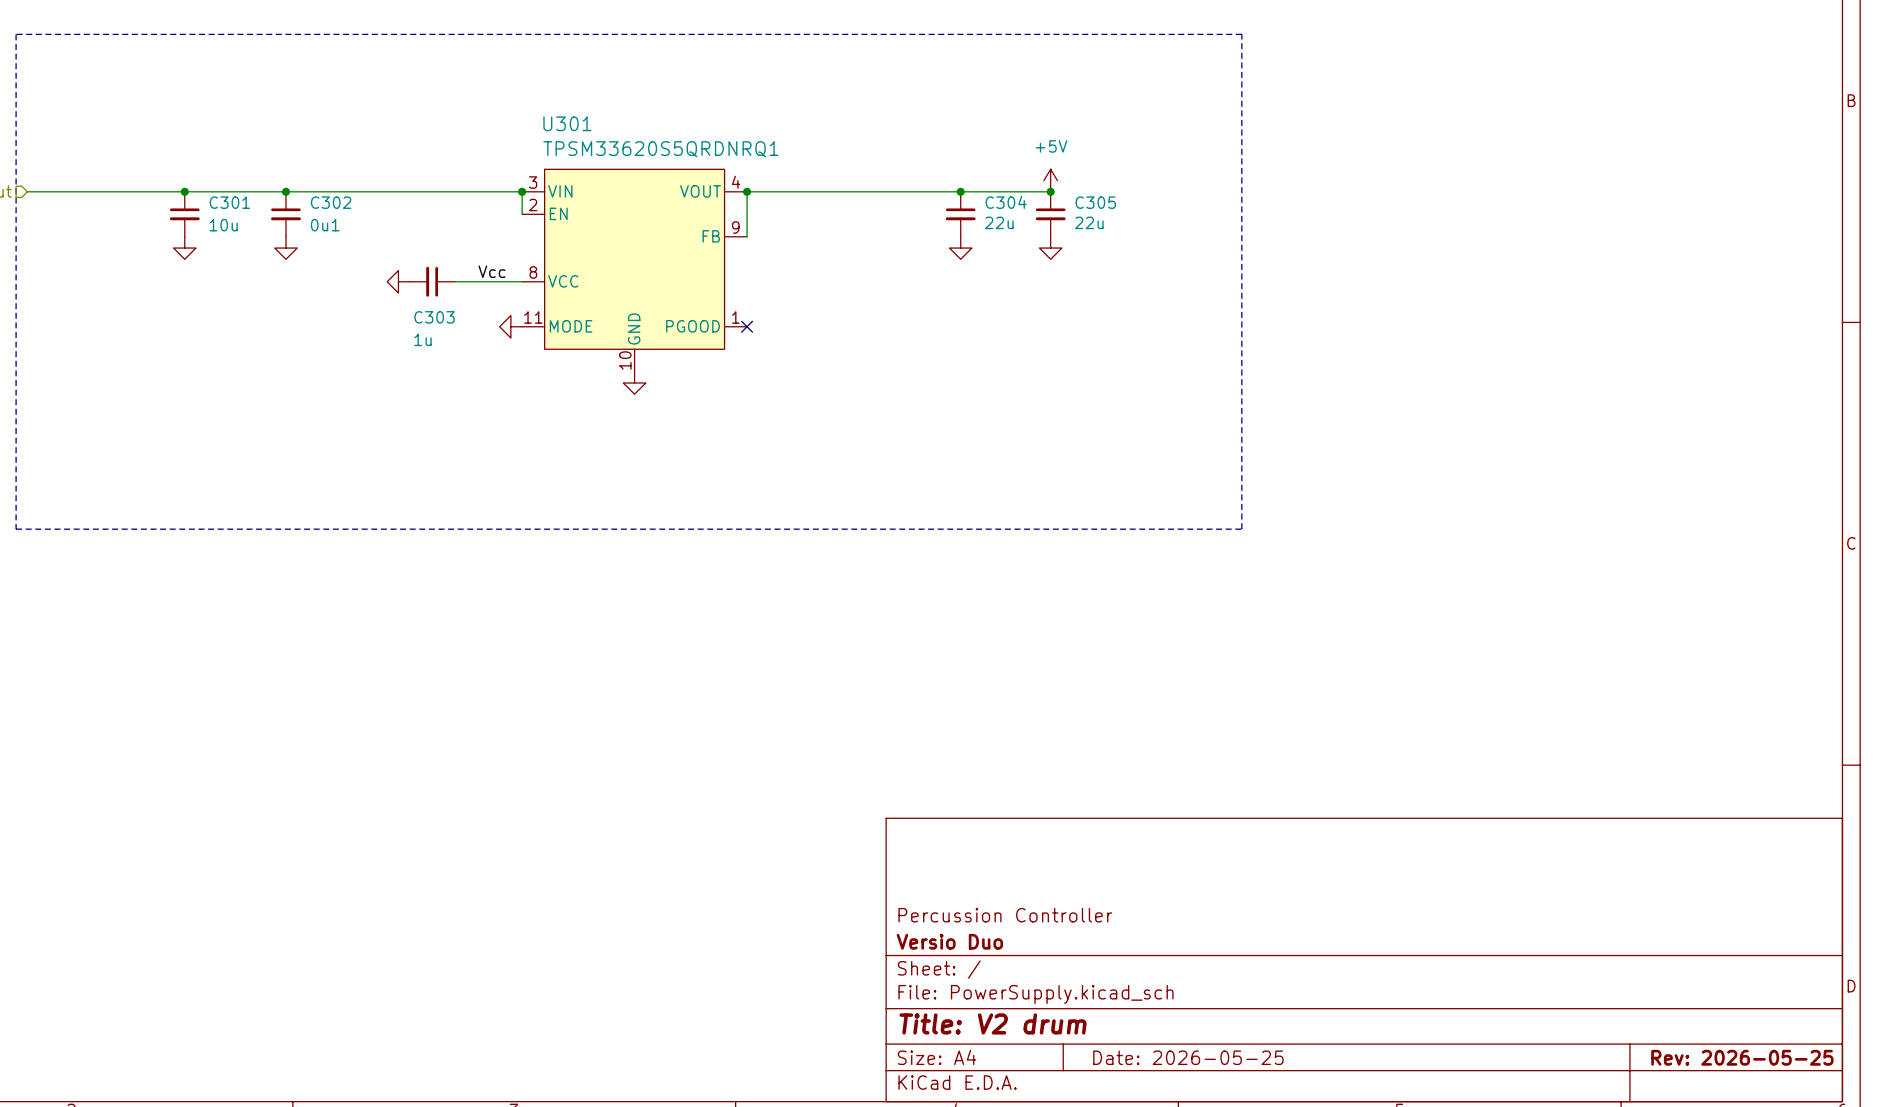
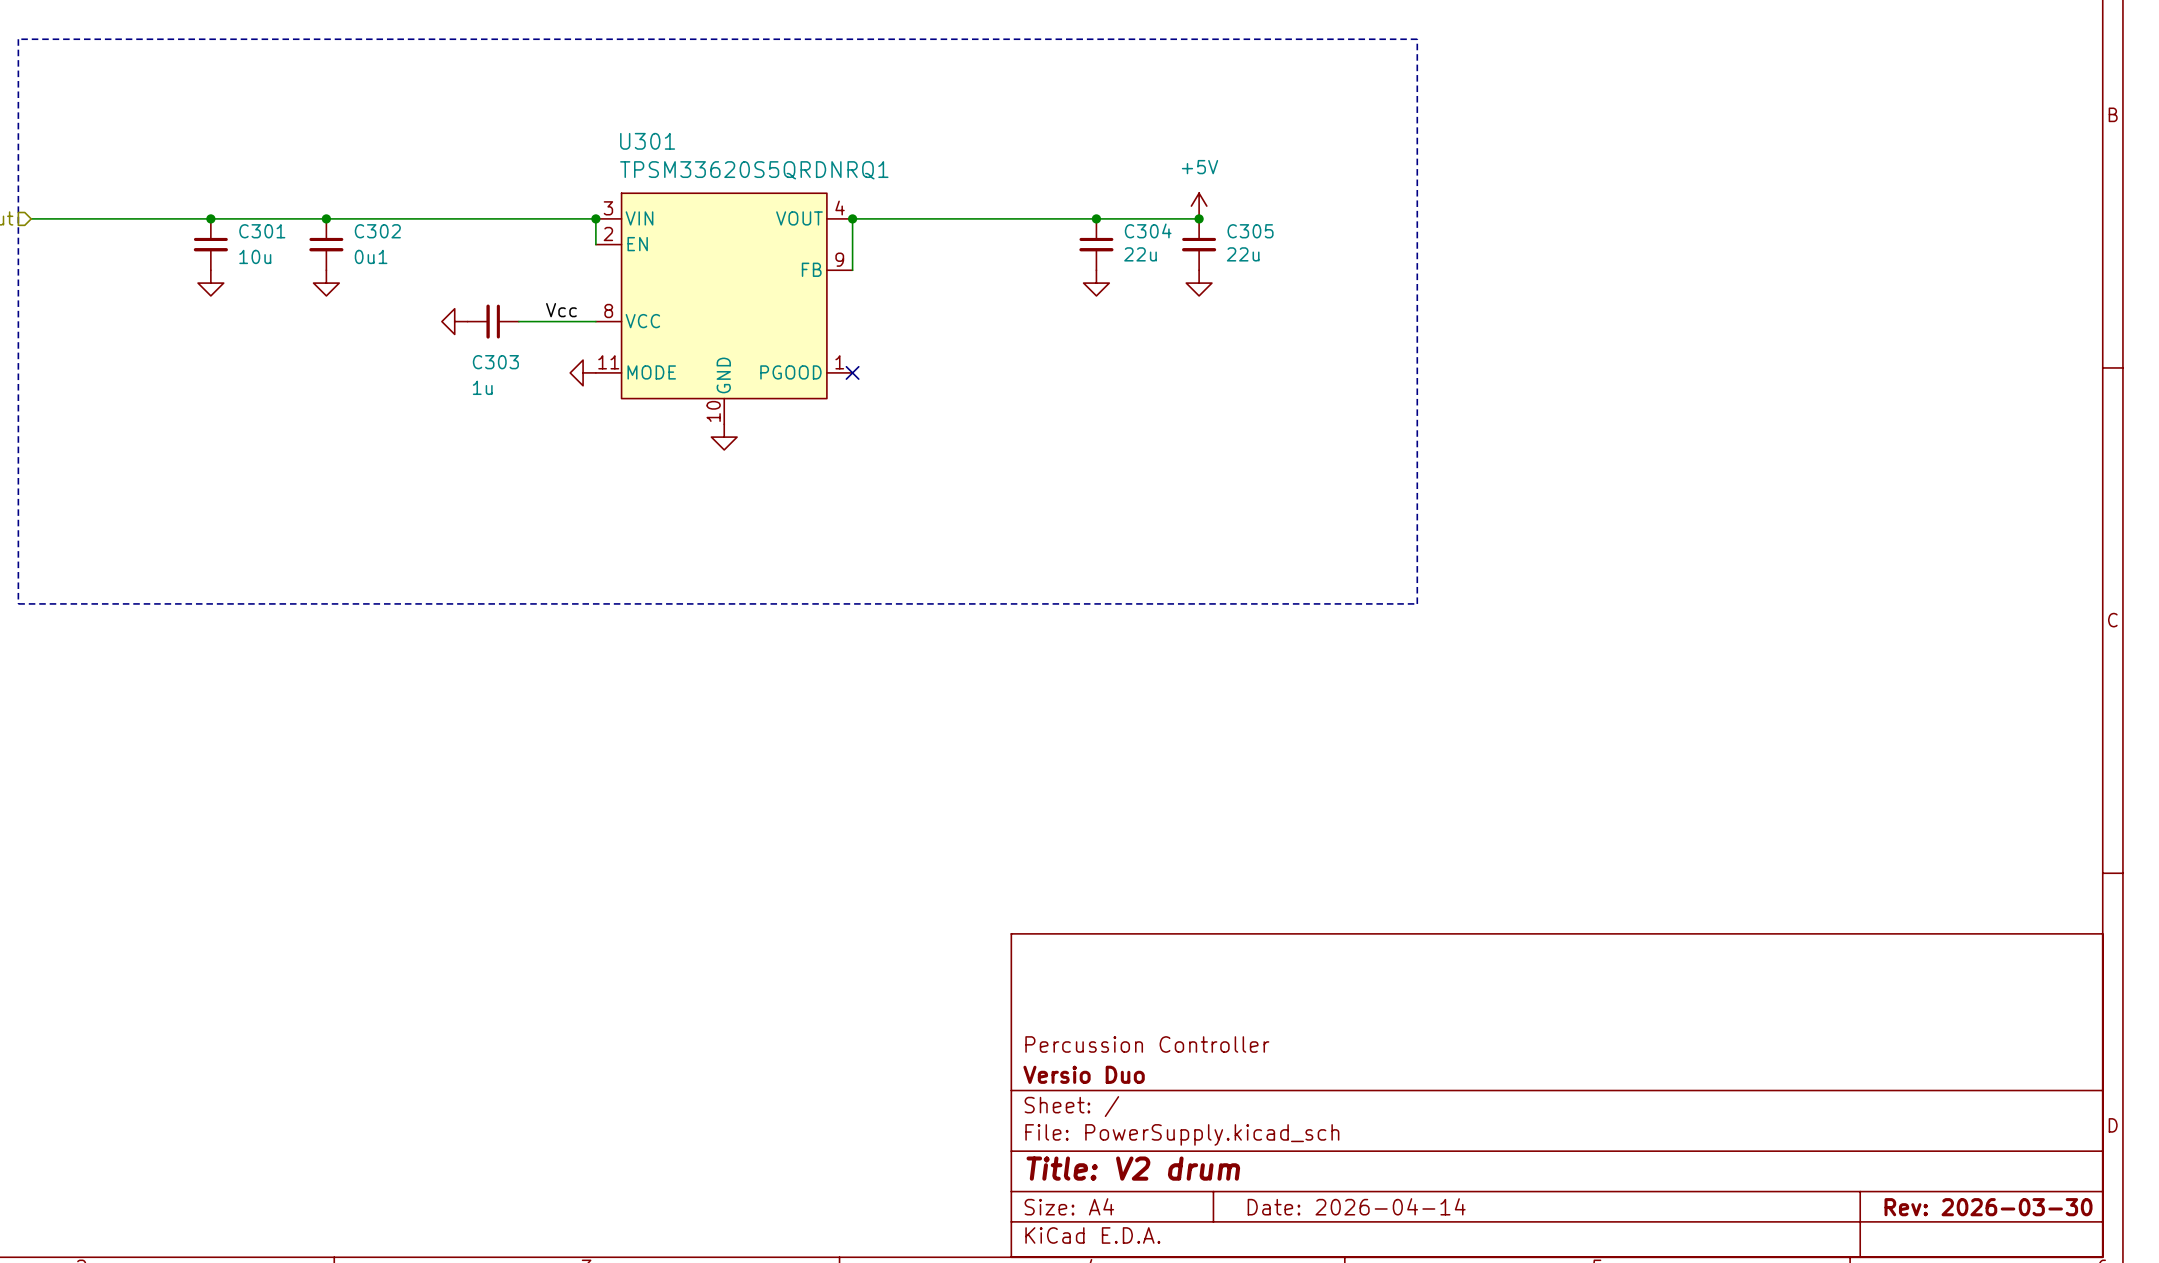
title block: Date: 2026-05-25 (1188, 1057) -> Date: 2026-04-14 (1356, 1206)
title block: Rev: 2026-05-25 (1742, 1057) -> Rev: 2026-03-30 (1988, 1207)

